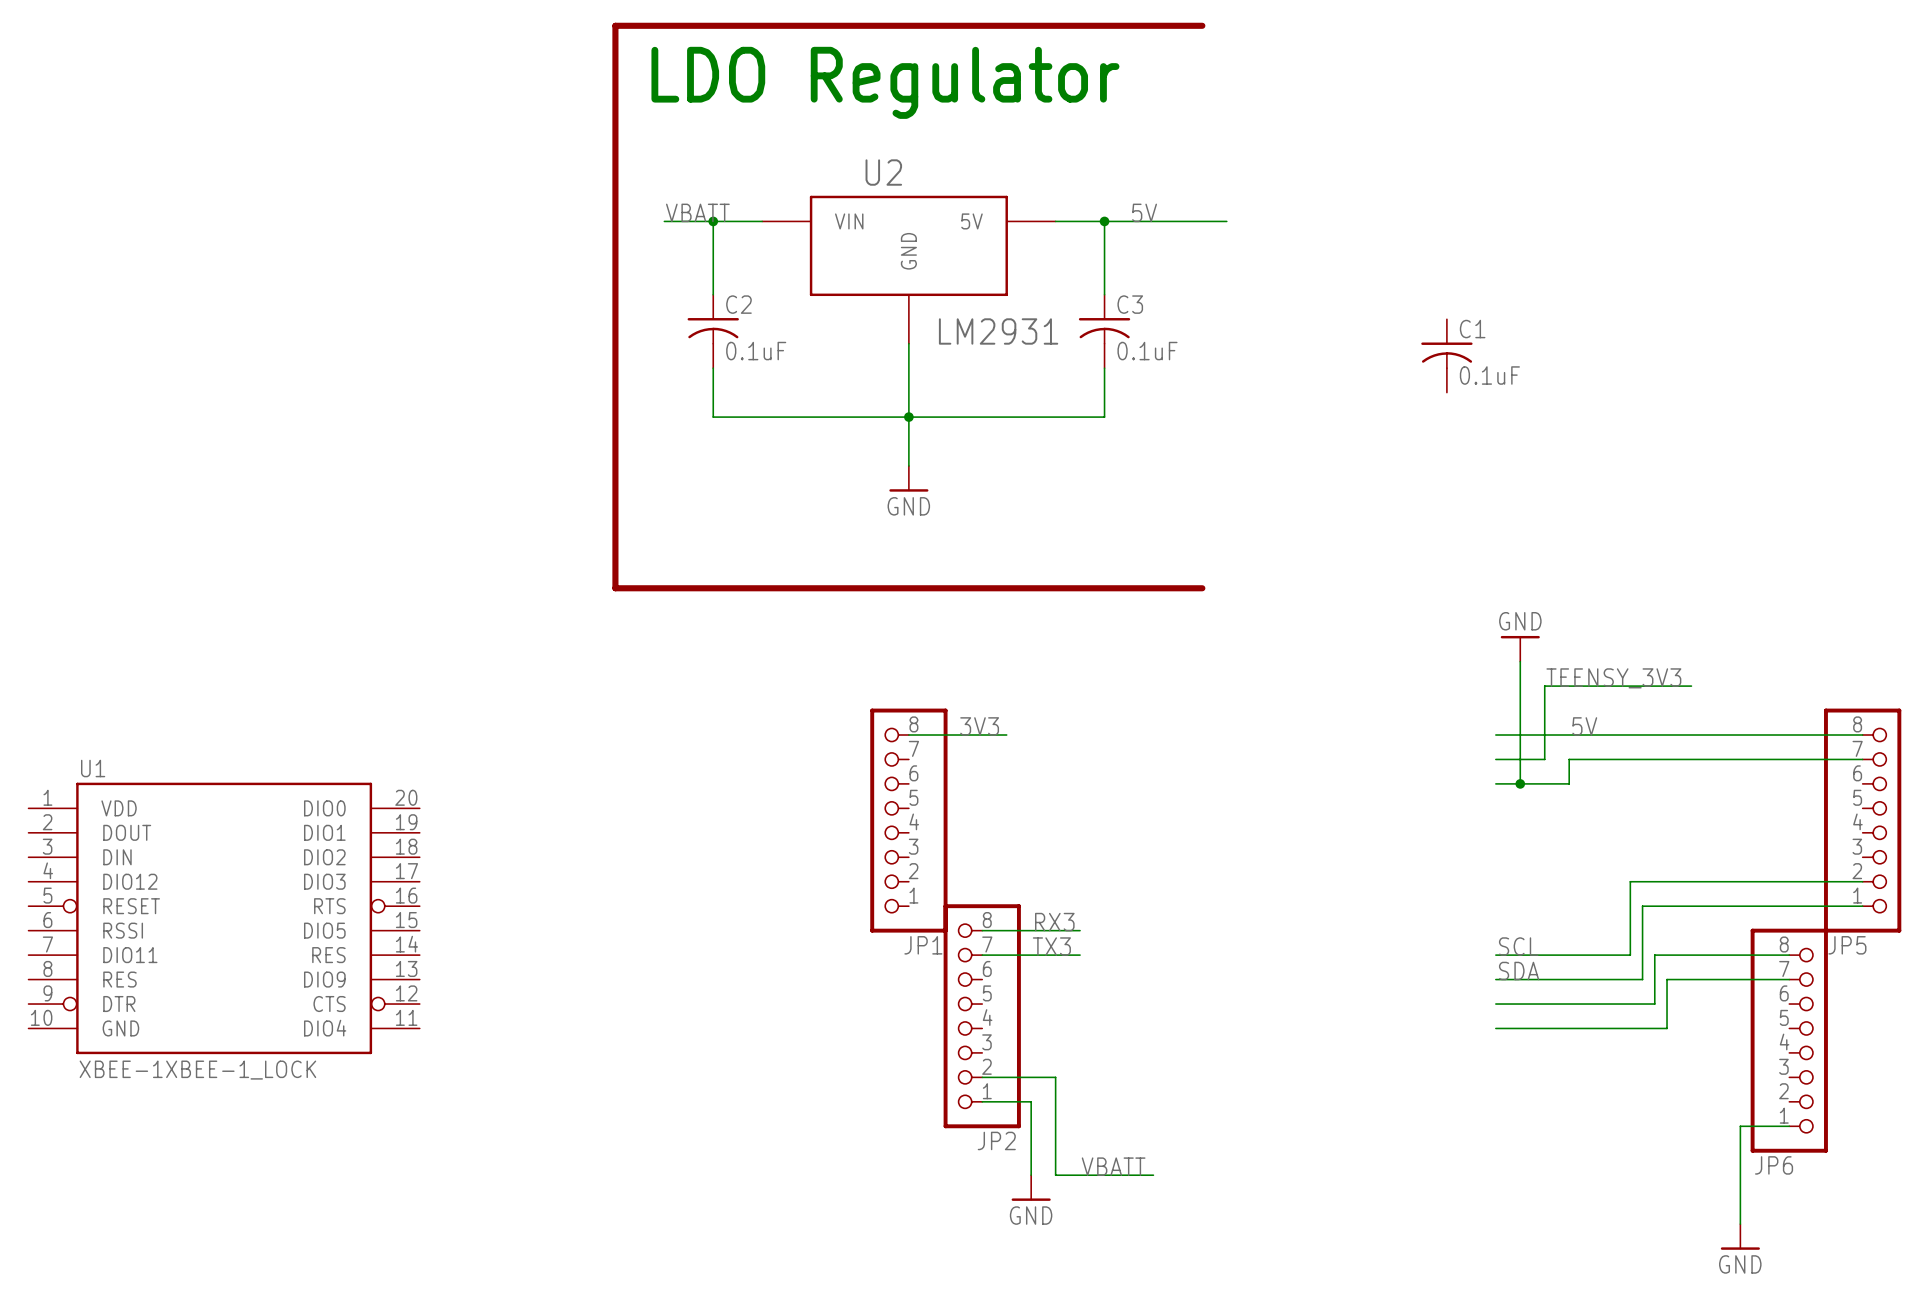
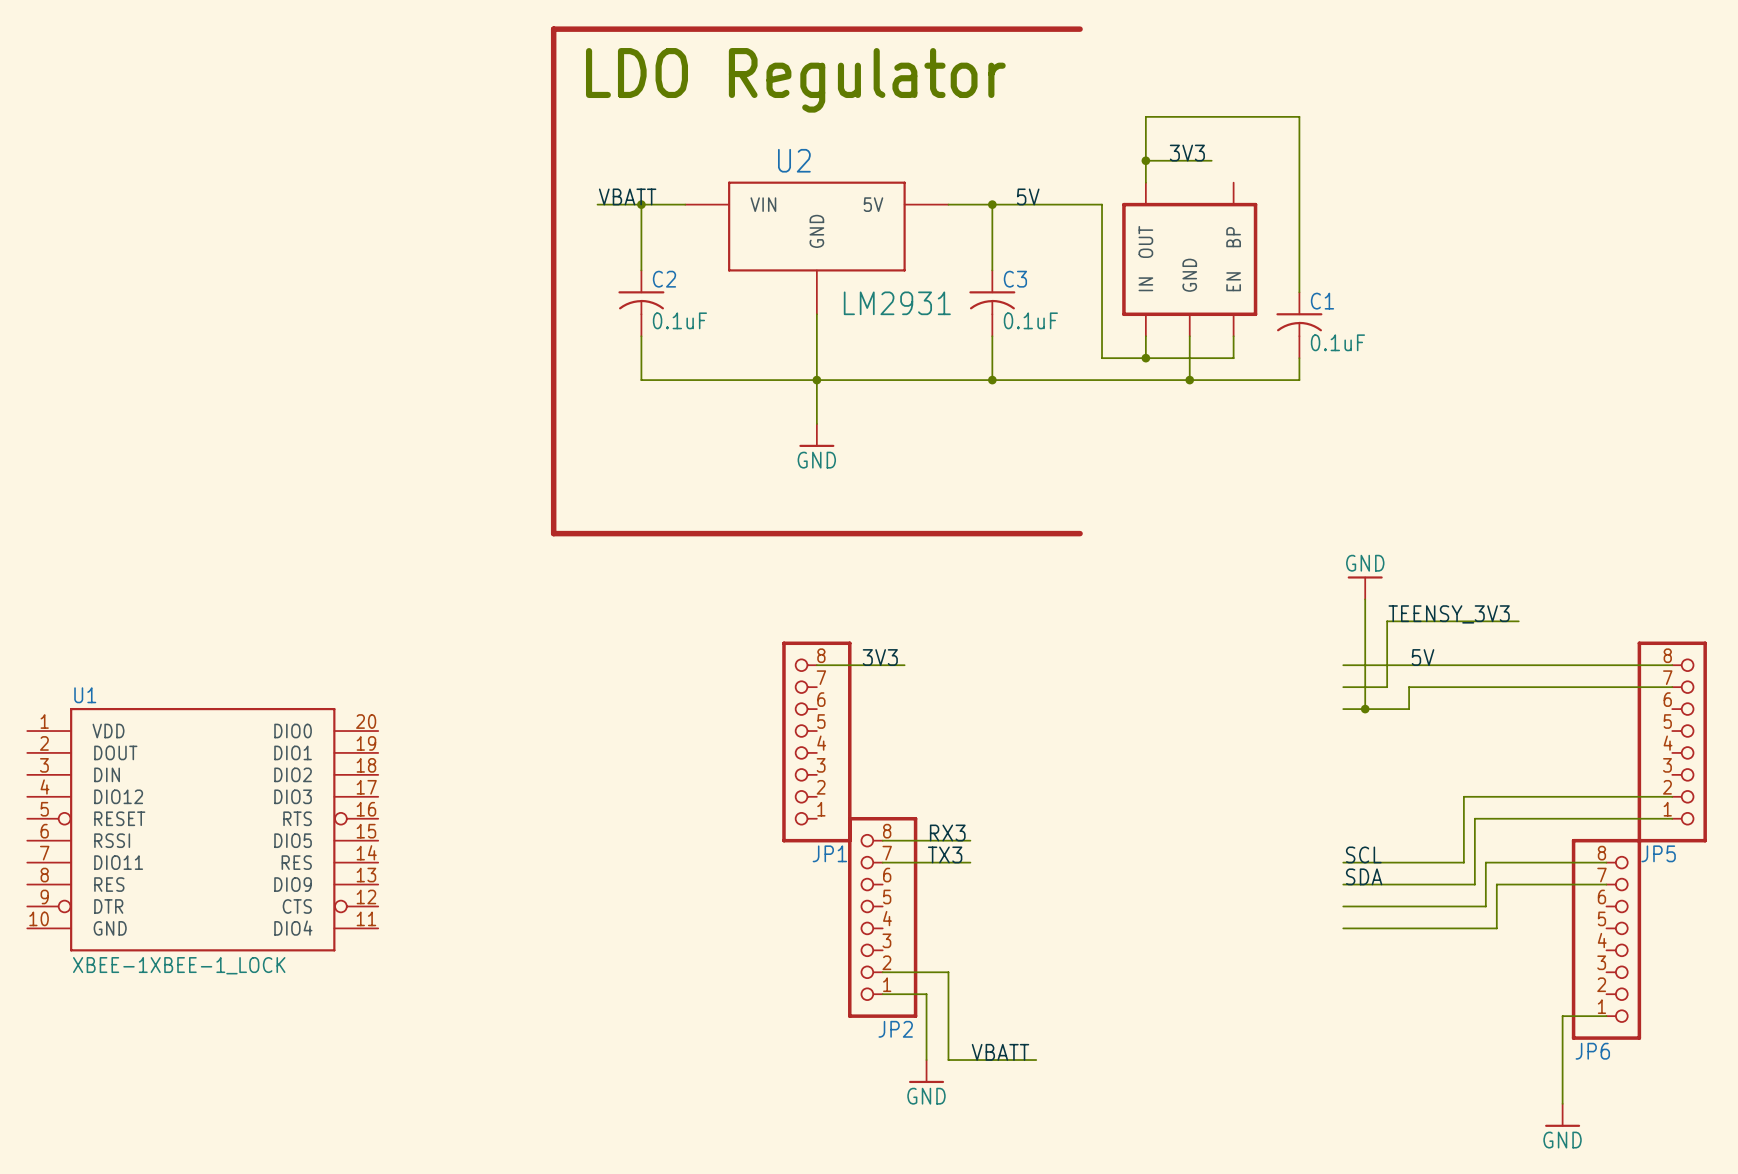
label: none -> 3V3 (1187, 153)
wire: none -> (1145, 160) (1211, 160)
junction: none -> (1145, 160)
wire: none -> (1145, 182) (1145, 116) (1299, 116) (1299, 292)
wire: none -> (1102, 204) (1102, 358) (1233, 358) (1233, 336)
part: none -> (1189, 259)
wire: none -> (1145, 336) (1145, 358)
wire: none -> (1189, 336) (1189, 380)
junction: none -> (1145, 358)
wire: none -> (1299, 358) (1299, 380) (992, 380)
junction: none -> (992, 380)
junction: none -> (1189, 380)

